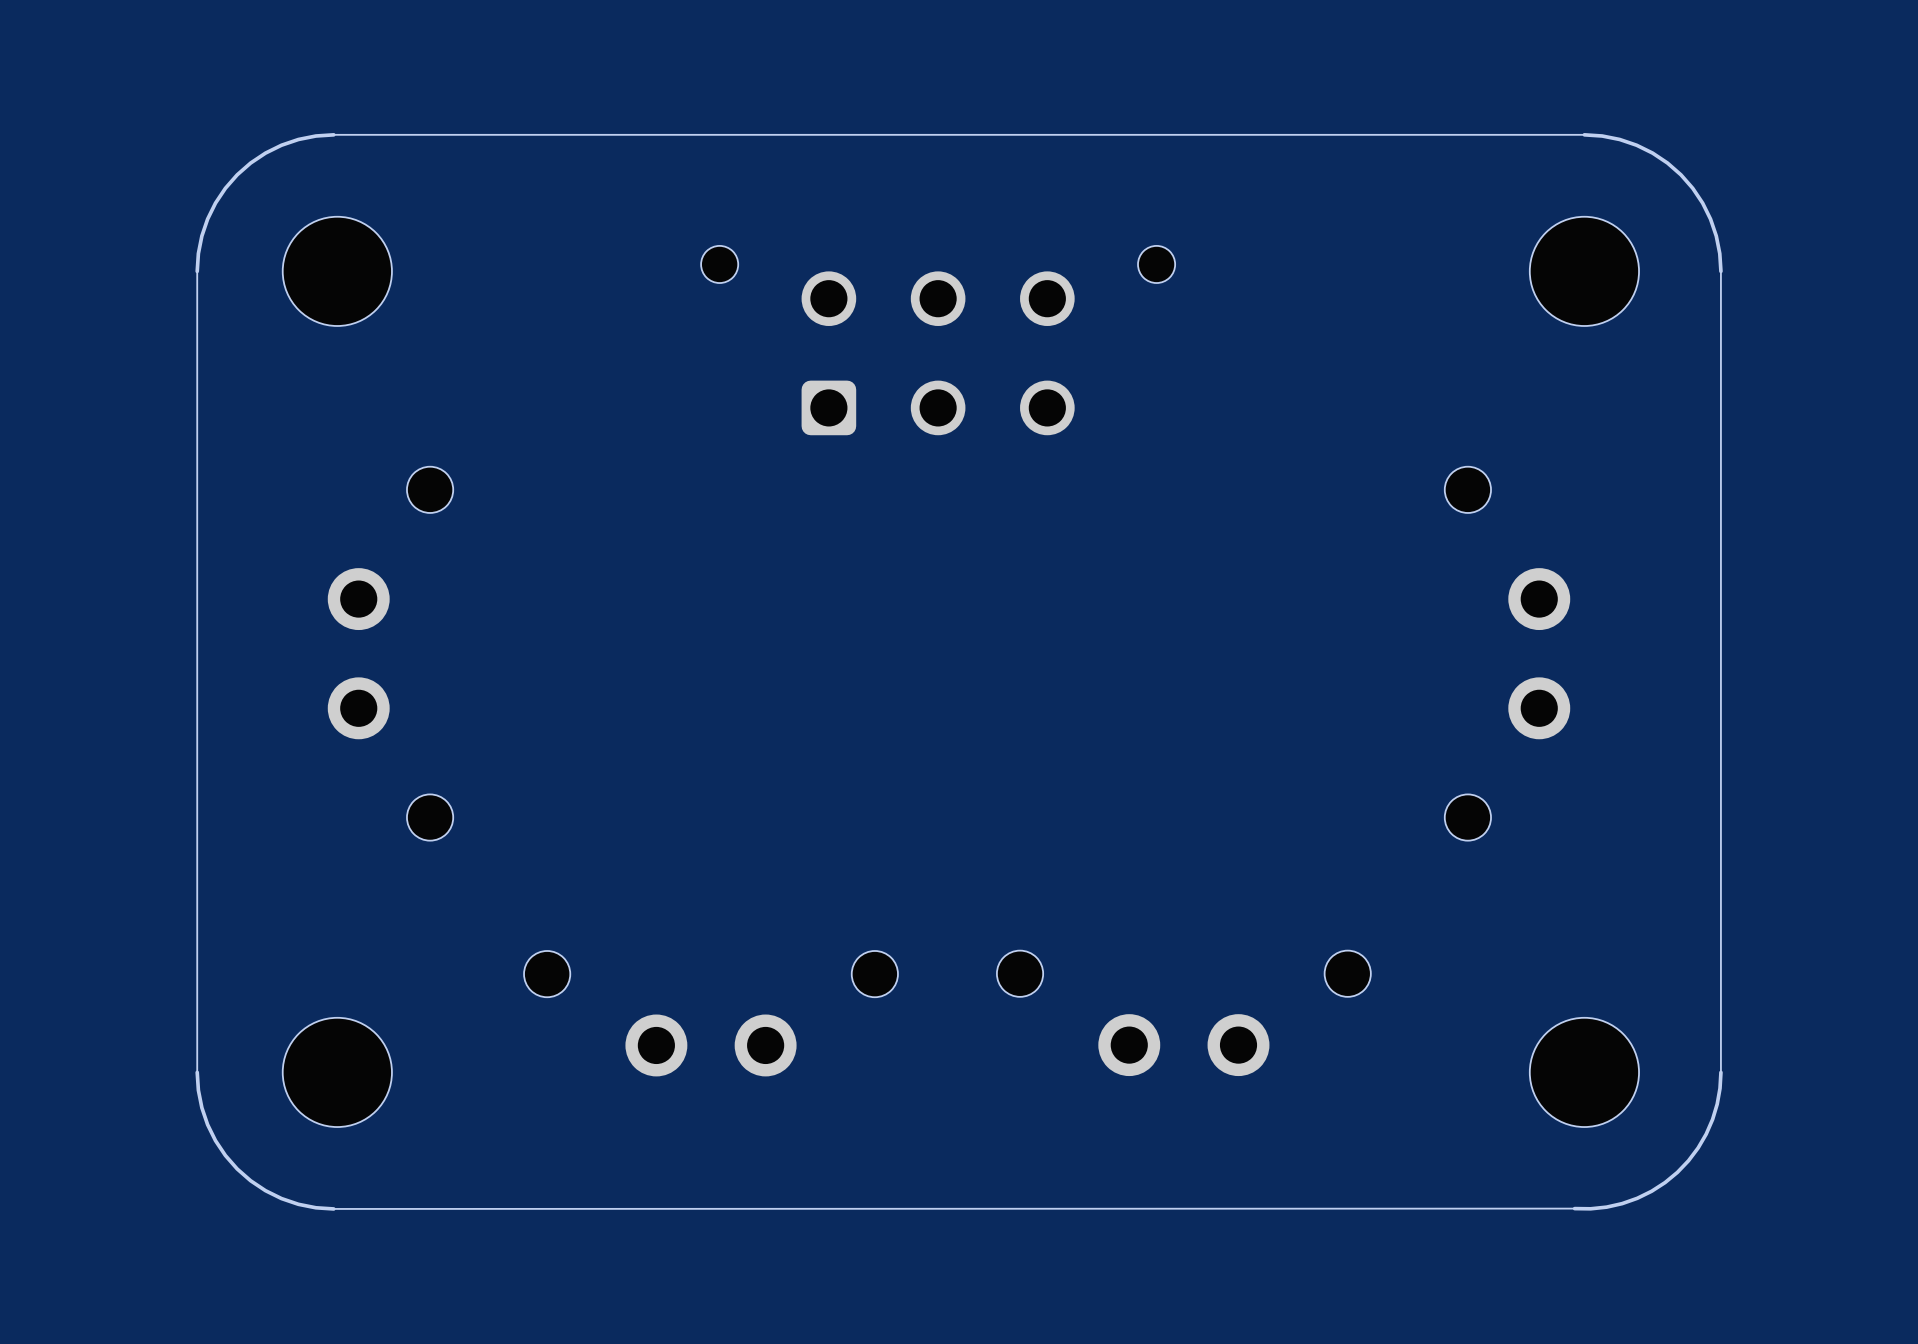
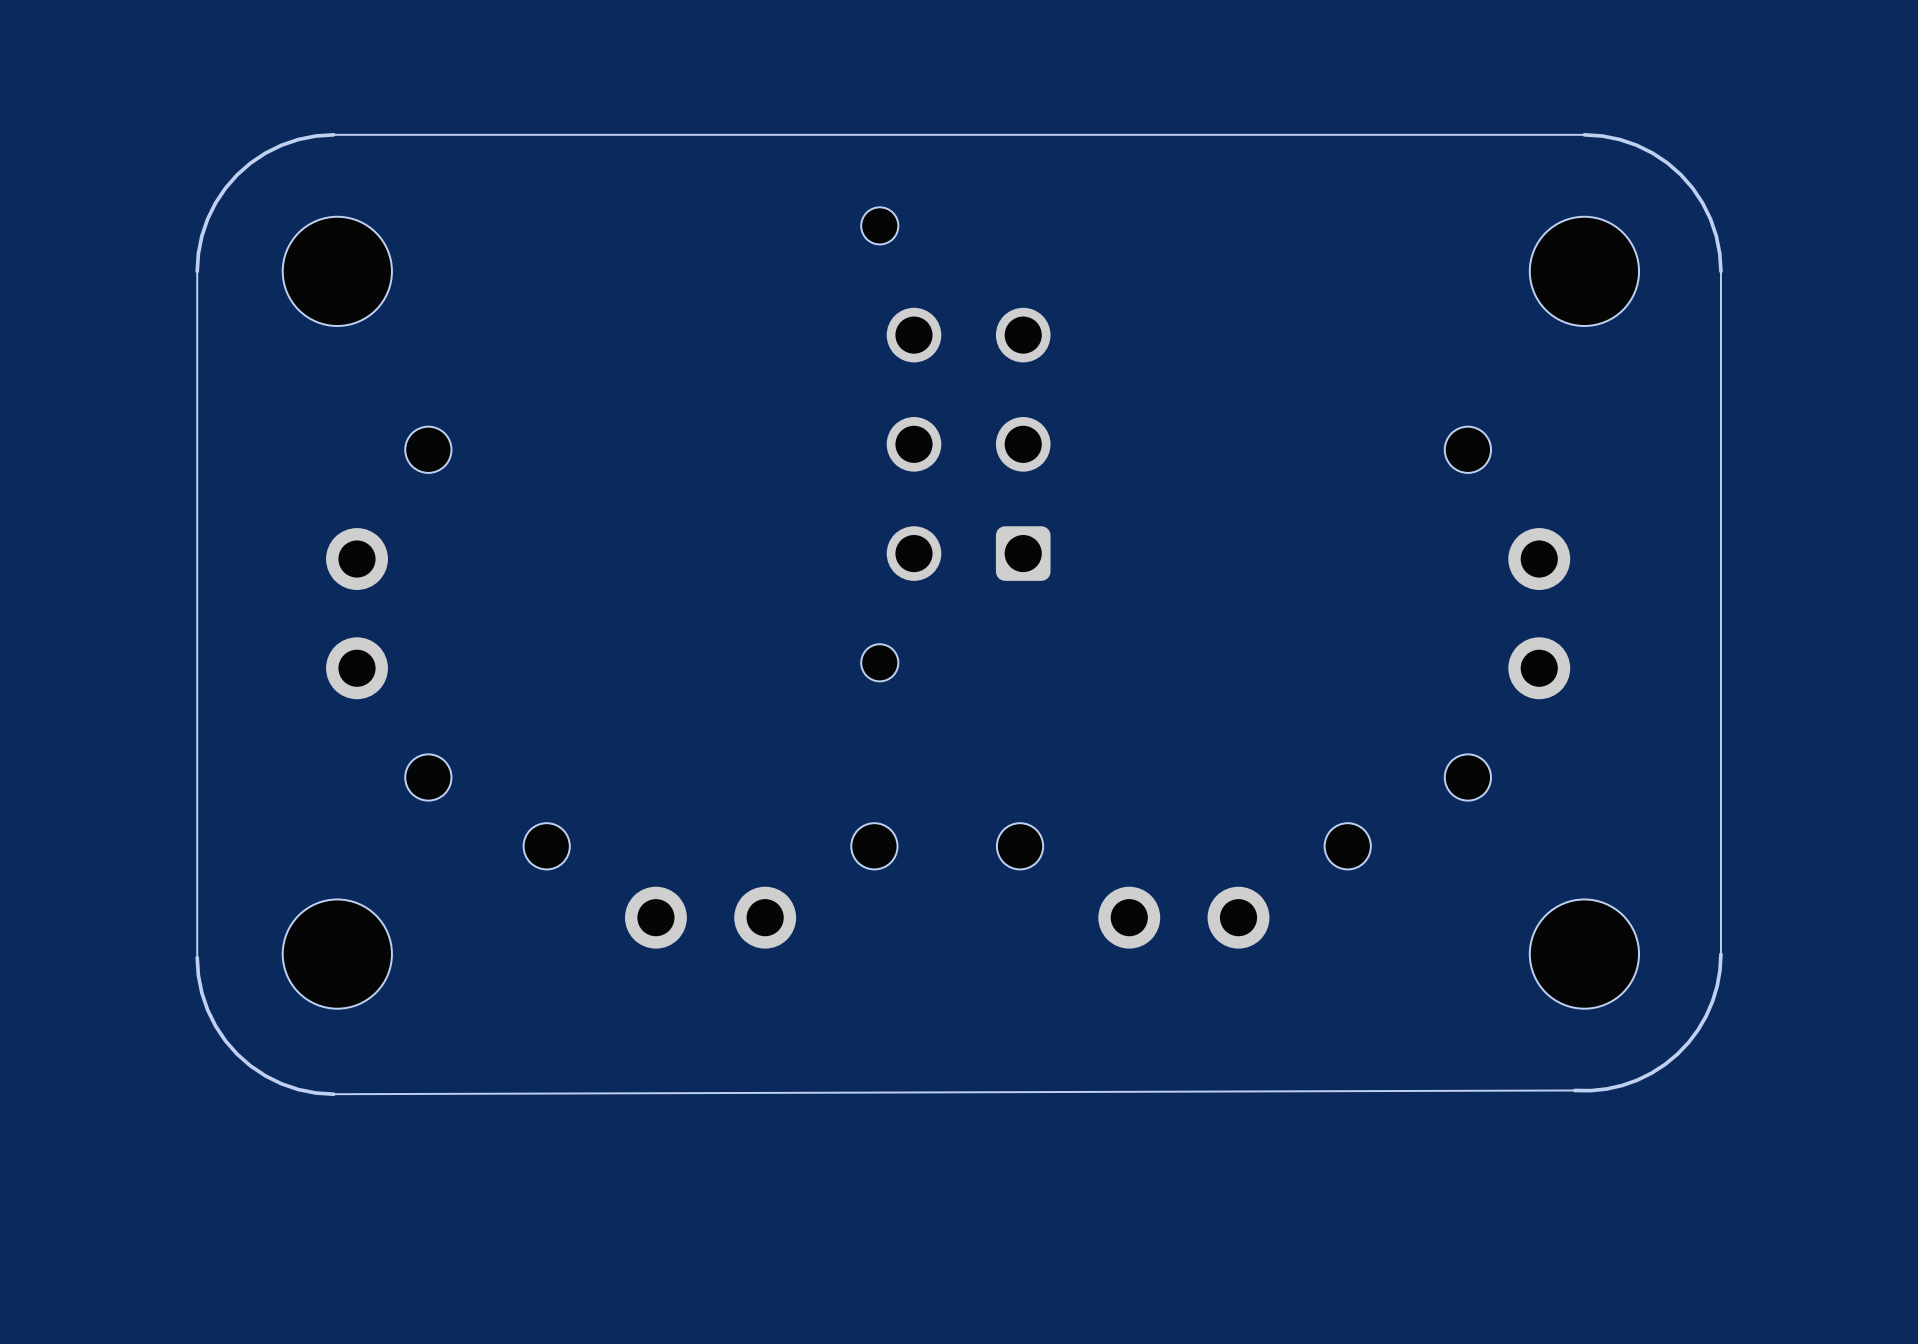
part rotation: 0° (938, 340) -> 90° counterclockwise (955, 444)
part position: (390, 653) -> (388, 613)
part position: (1507, 653) -> (1507, 613)
board edge: (1720, 954) (1720, 1088) (1712, 1119) (1706, 1134) (1698, 1147) (1677, 1172) (1651, 1191) (1622, 1203) (1590, 1208) (315, 1207) (281, 1198) (250, 1180) (225, 1155) (207, 1124) (198, 1090) (197, 1072) (197, 957) -> (1720, 954) (1720, 970) (1712, 1001) (1706, 1016) (1688, 1042) (1665, 1064) (1637, 1080) (1606, 1089) (1590, 1090) (333, 1094) (315, 1093) (281, 1083) (250, 1065) (237, 1054) (215, 1025) (207, 1009) (201, 993) (197, 957)
part position: (711, 1013) -> (710, 885)
part position: (1183, 1013) -> (1183, 885)
part position: (337, 1072) -> (337, 954)
part position: (1584, 1072) -> (1584, 954)

